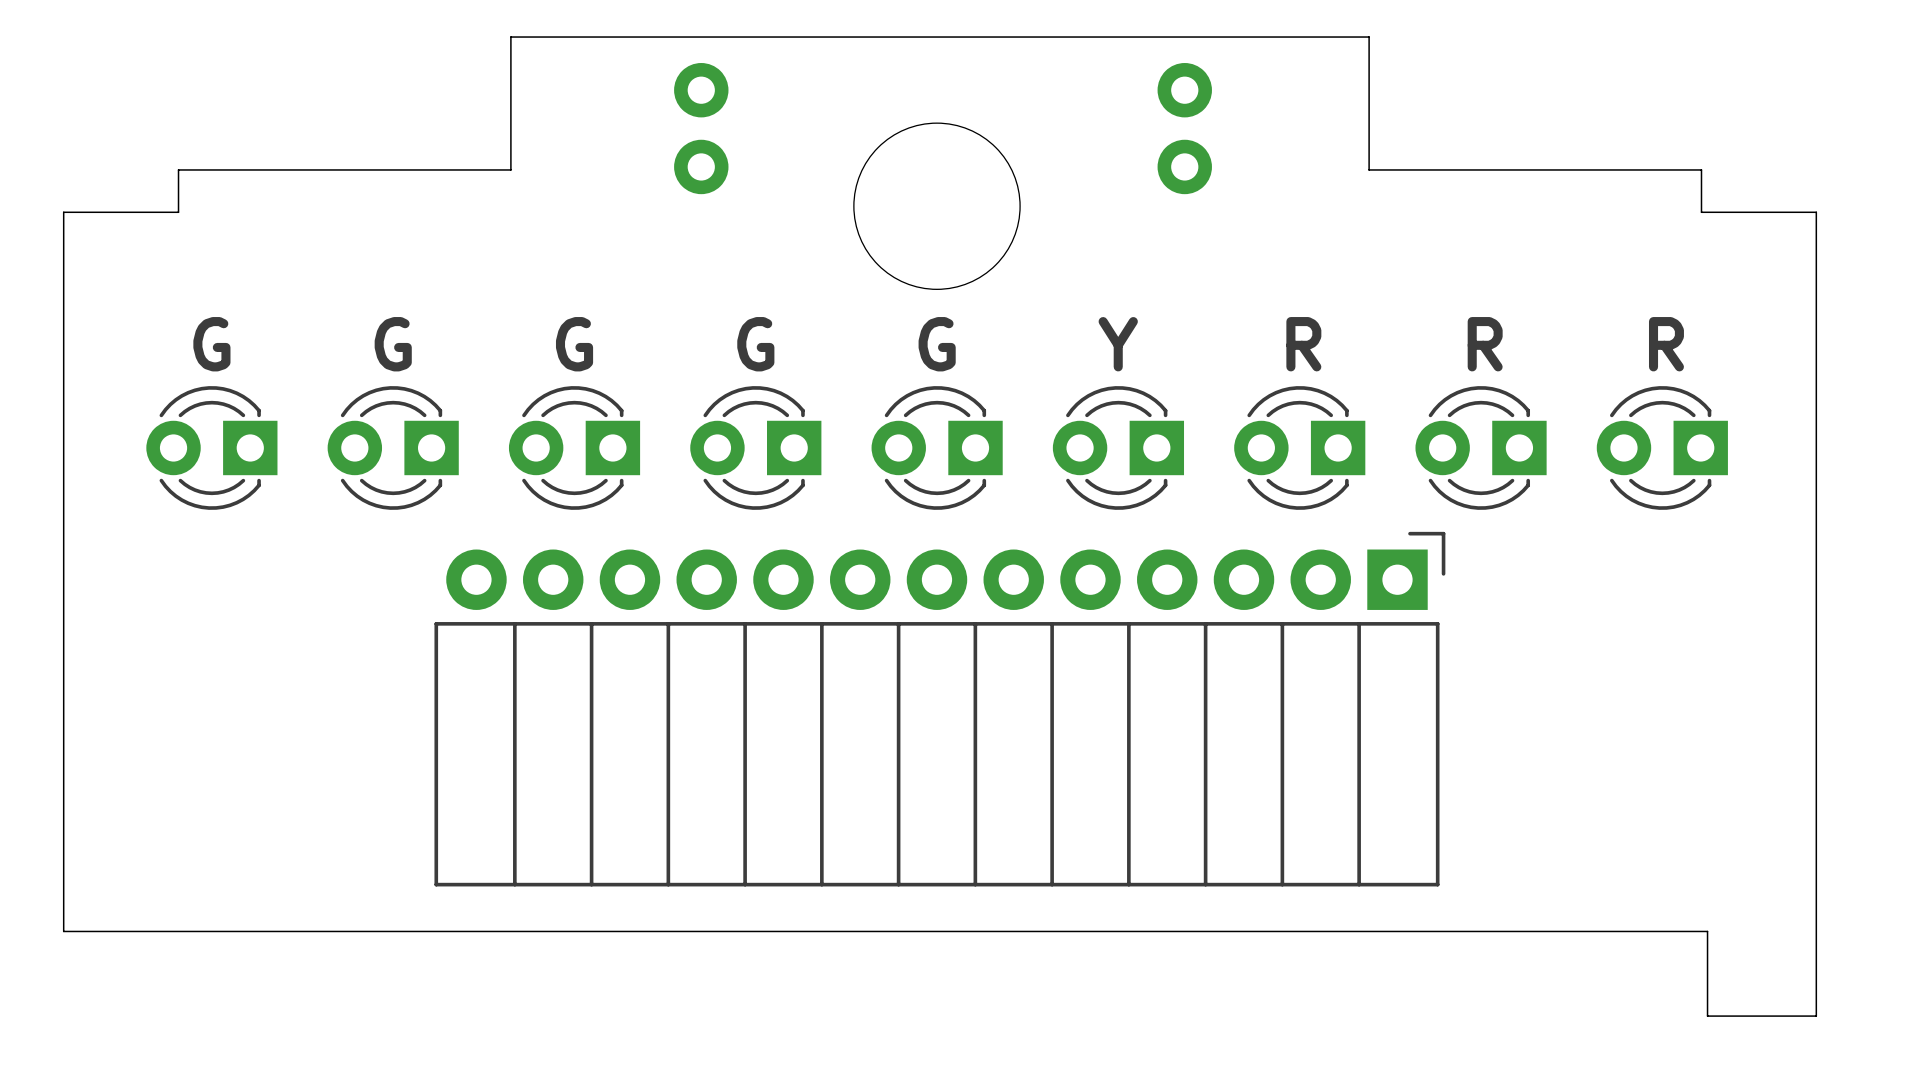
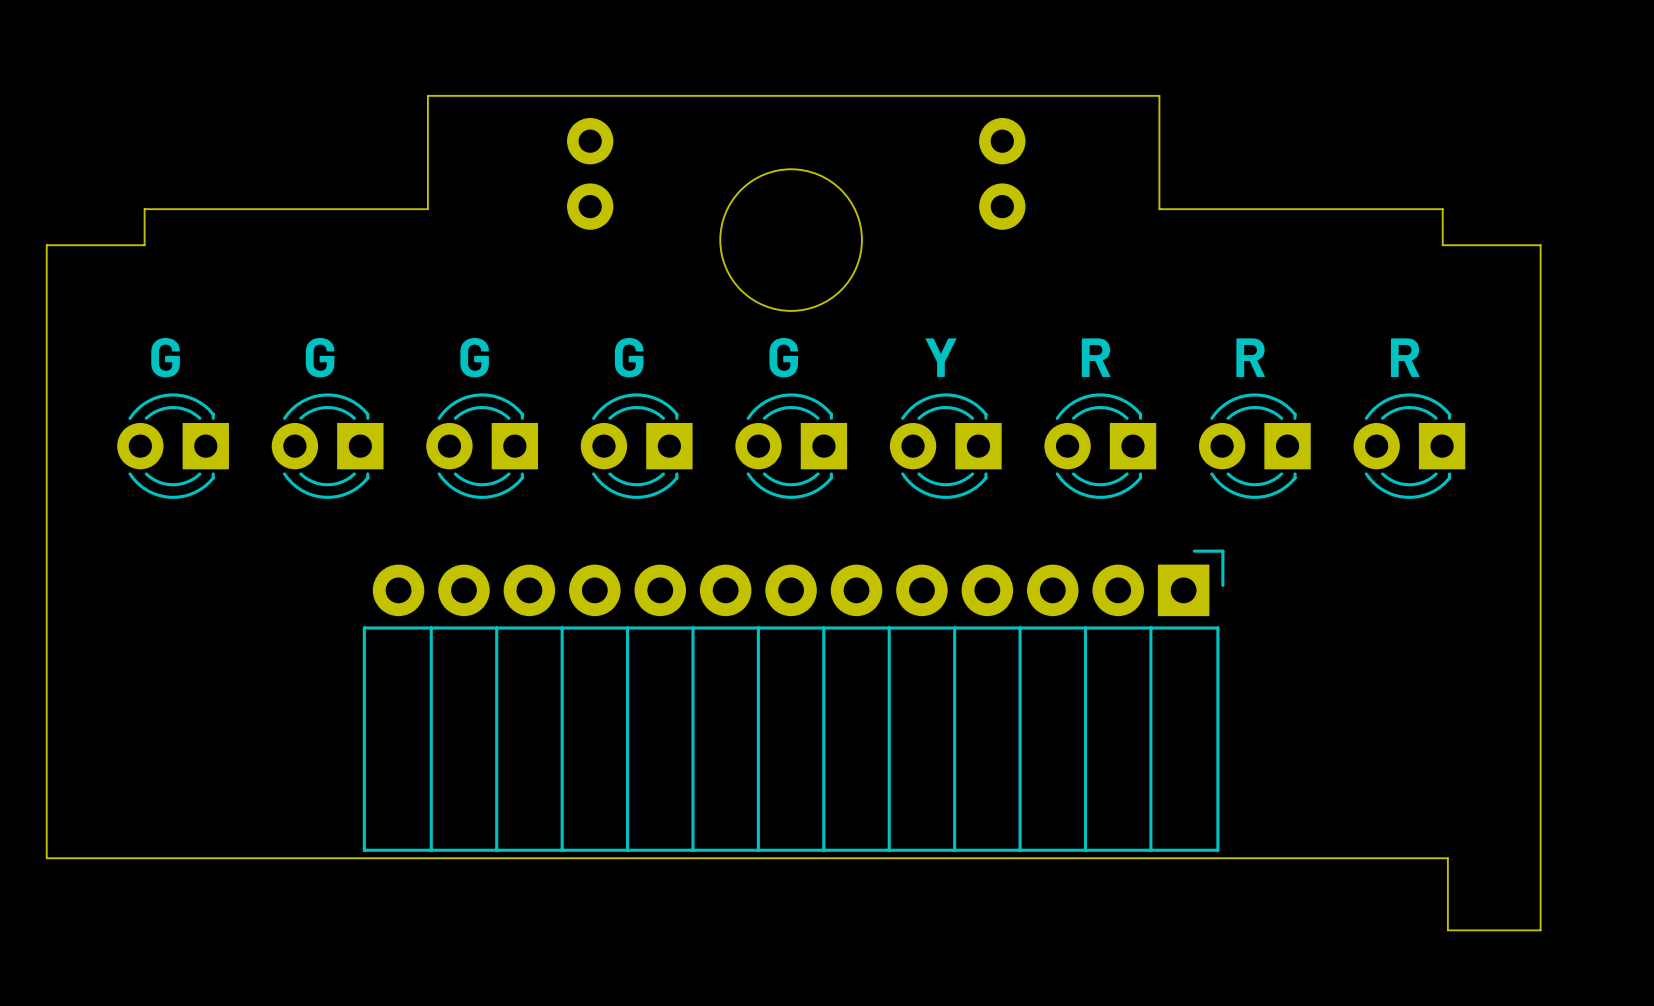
part position: (939, 709) -> (793, 700)

